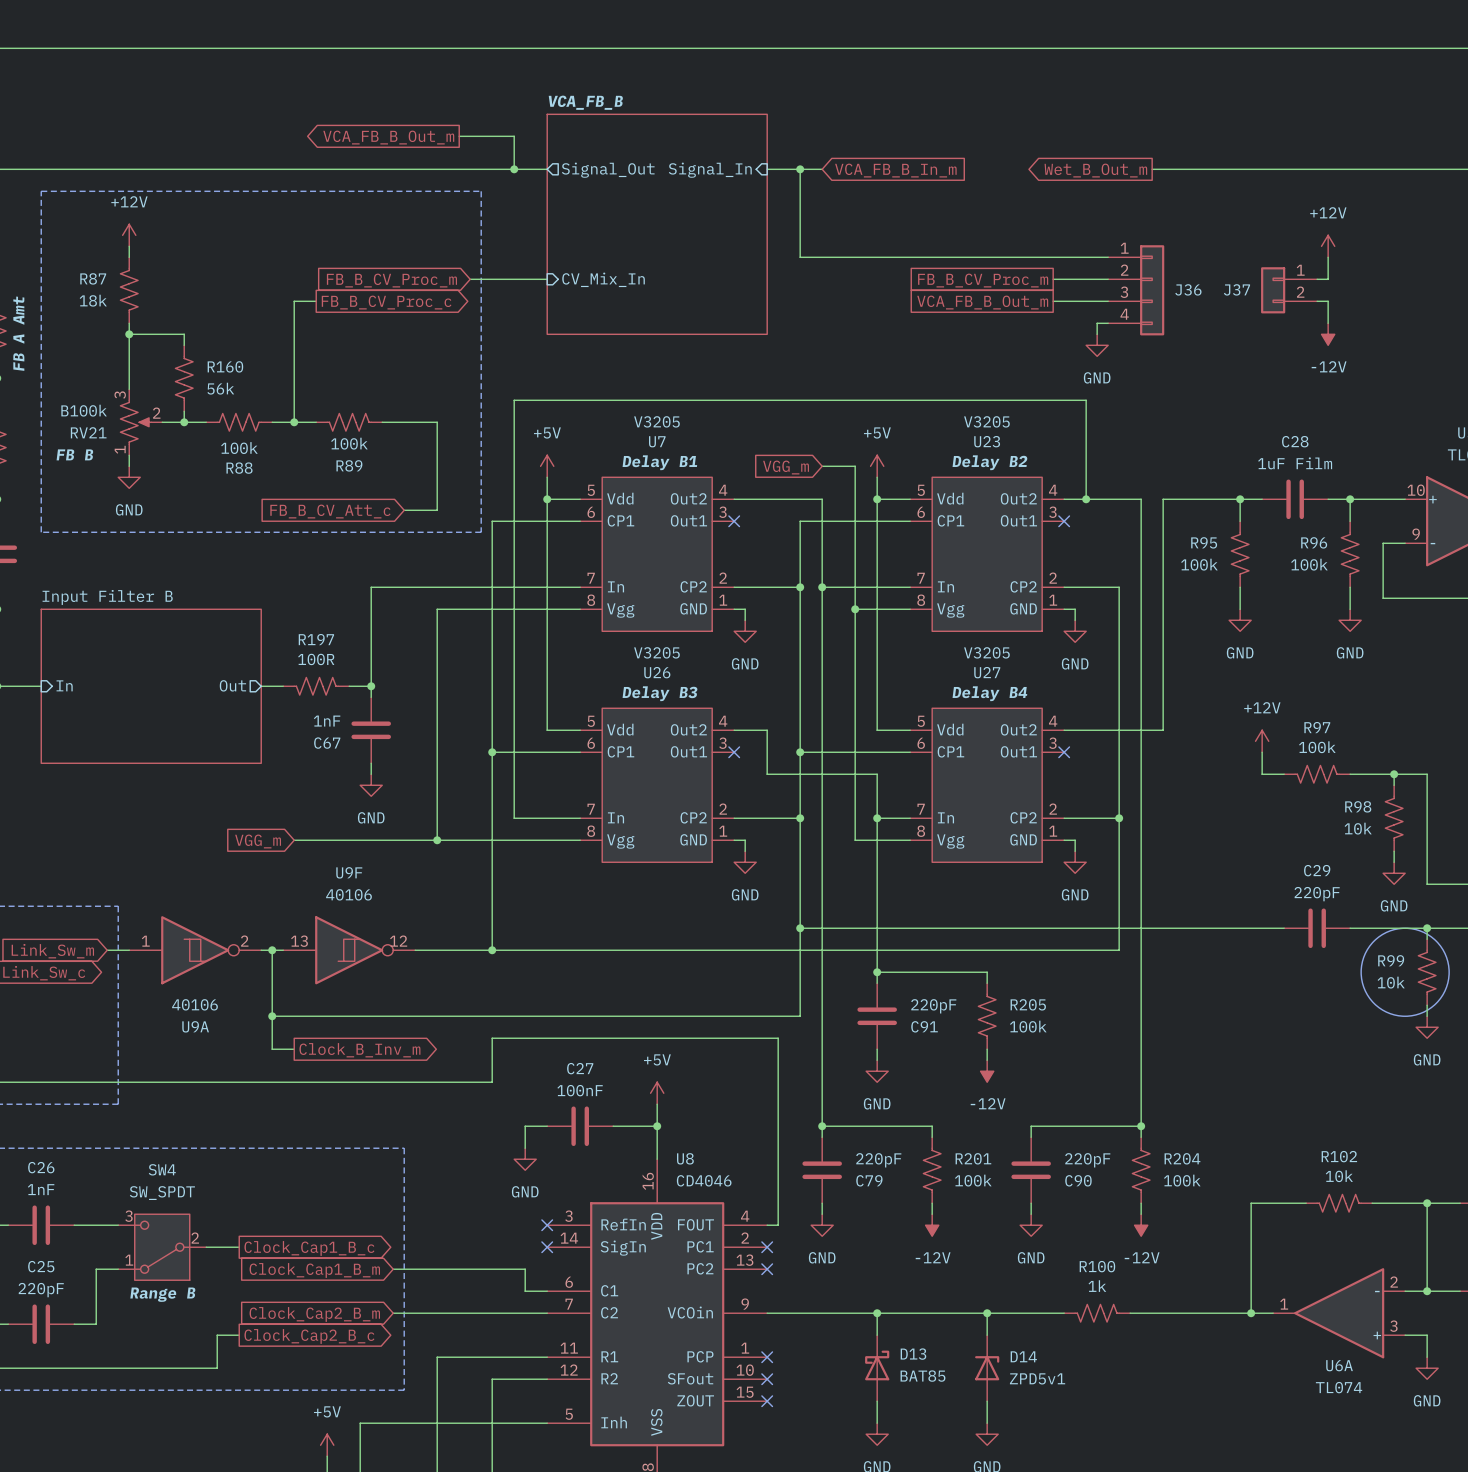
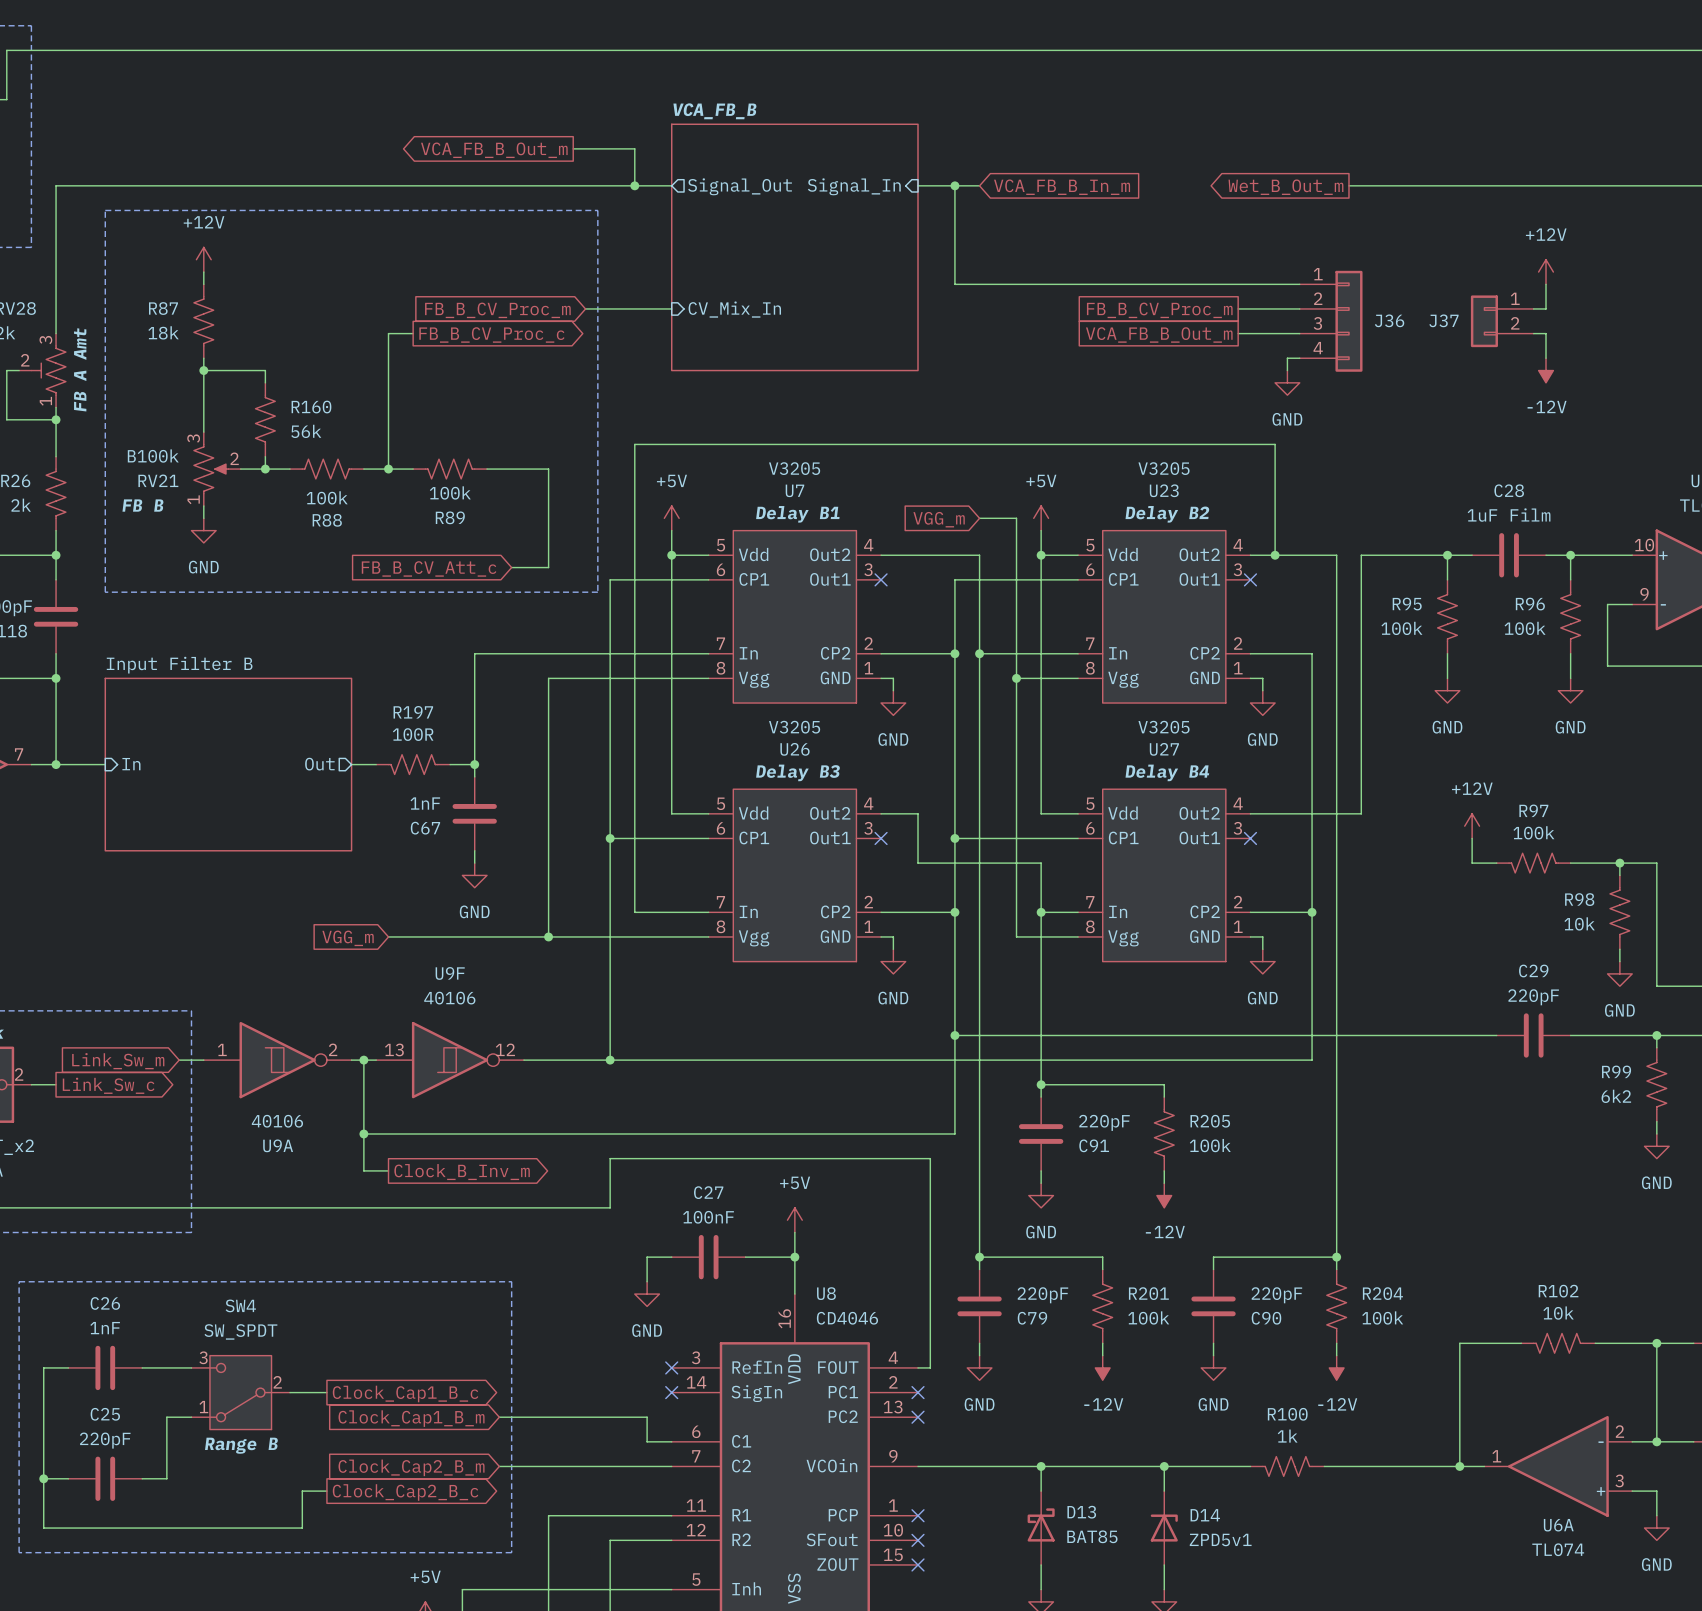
drawing: [1361, 928, 1450, 1017] -> none
R99 value: 10k (1391, 982) -> 6k2 (1616, 1096)

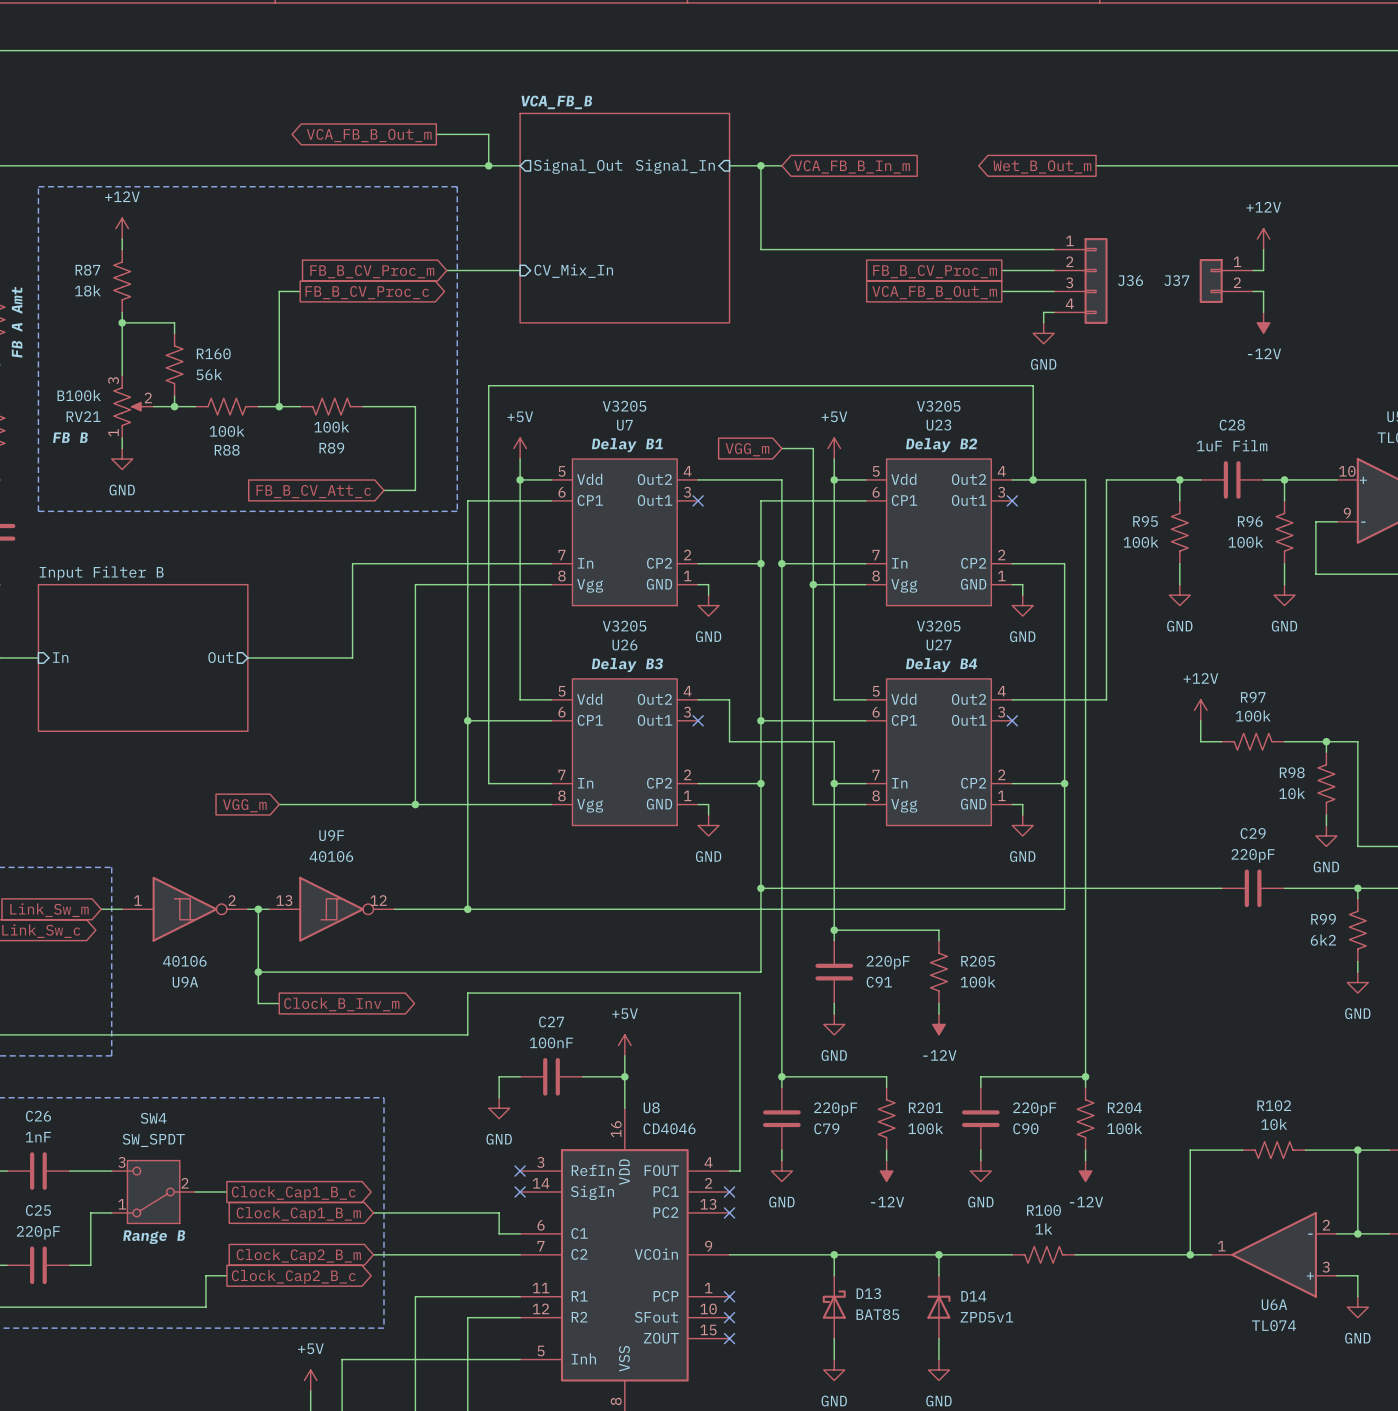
R197: 100R (413, 764) -> none
wire: (474, 764) (474, 776) -> none
junction: (474, 764) -> none
C67: 1nF (474, 813) -> none
wire: (474, 850) (474, 863) -> none
power symbol: GND (474, 875) -> none

